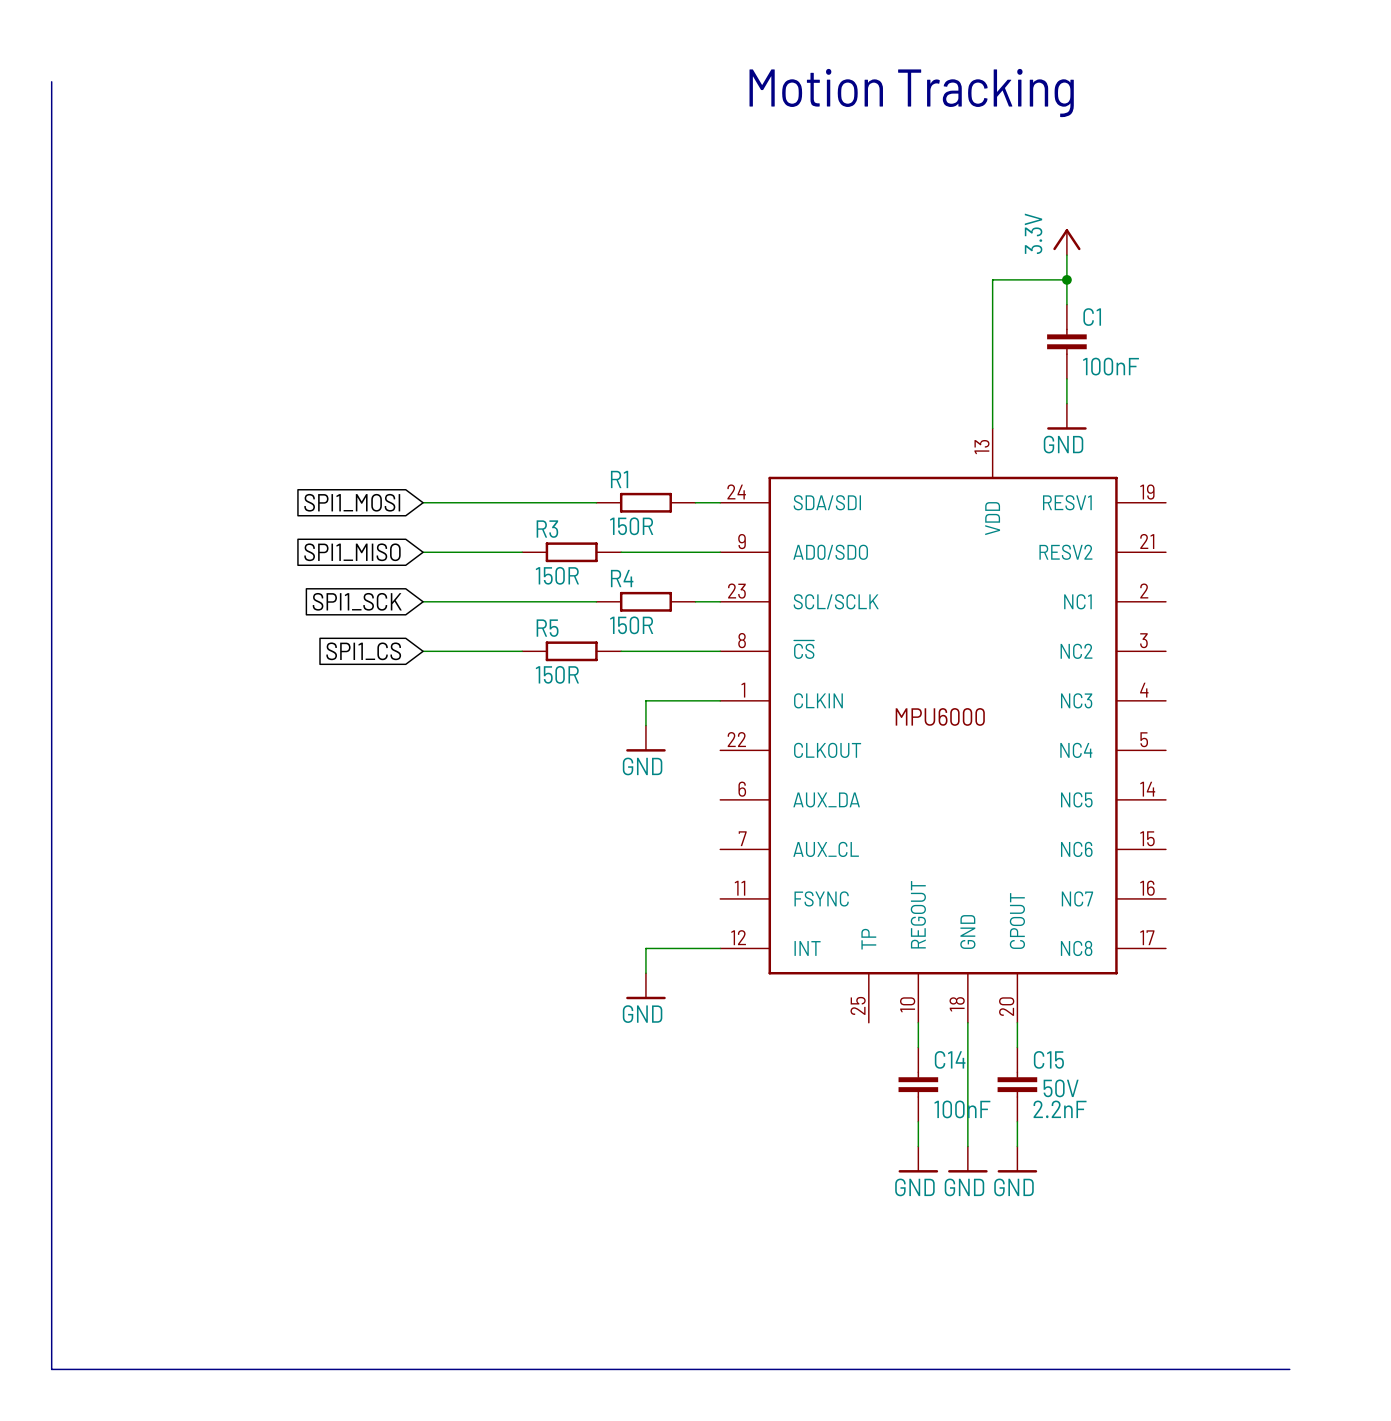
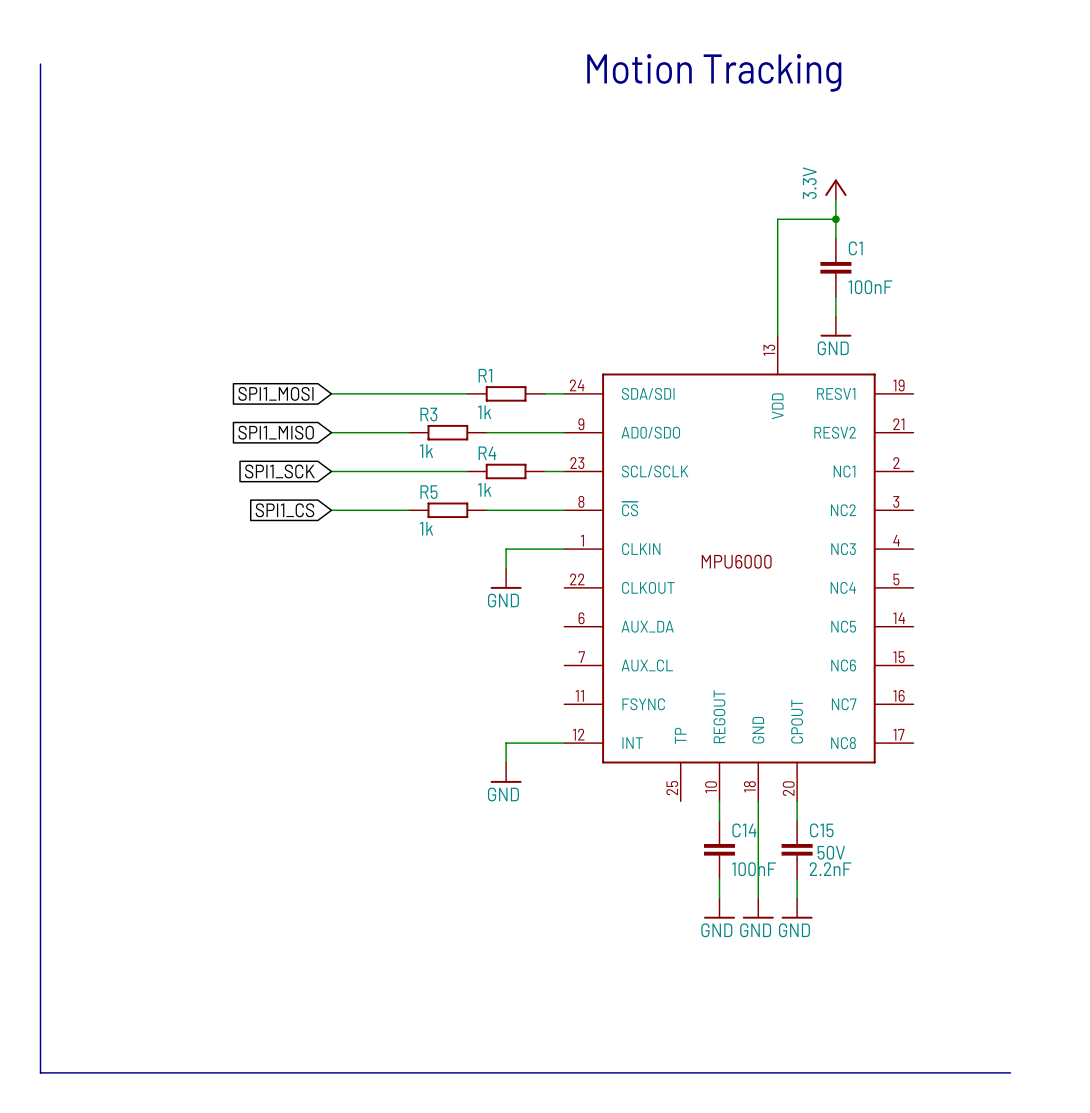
R1 value: 150R (631, 526) -> 1k (484, 412)
R3 value: 150R (557, 575) -> 1k (426, 451)
R4 value: 150R (631, 625) -> 1k (484, 489)
R5 value: 150R (557, 674) -> 1k (426, 528)

